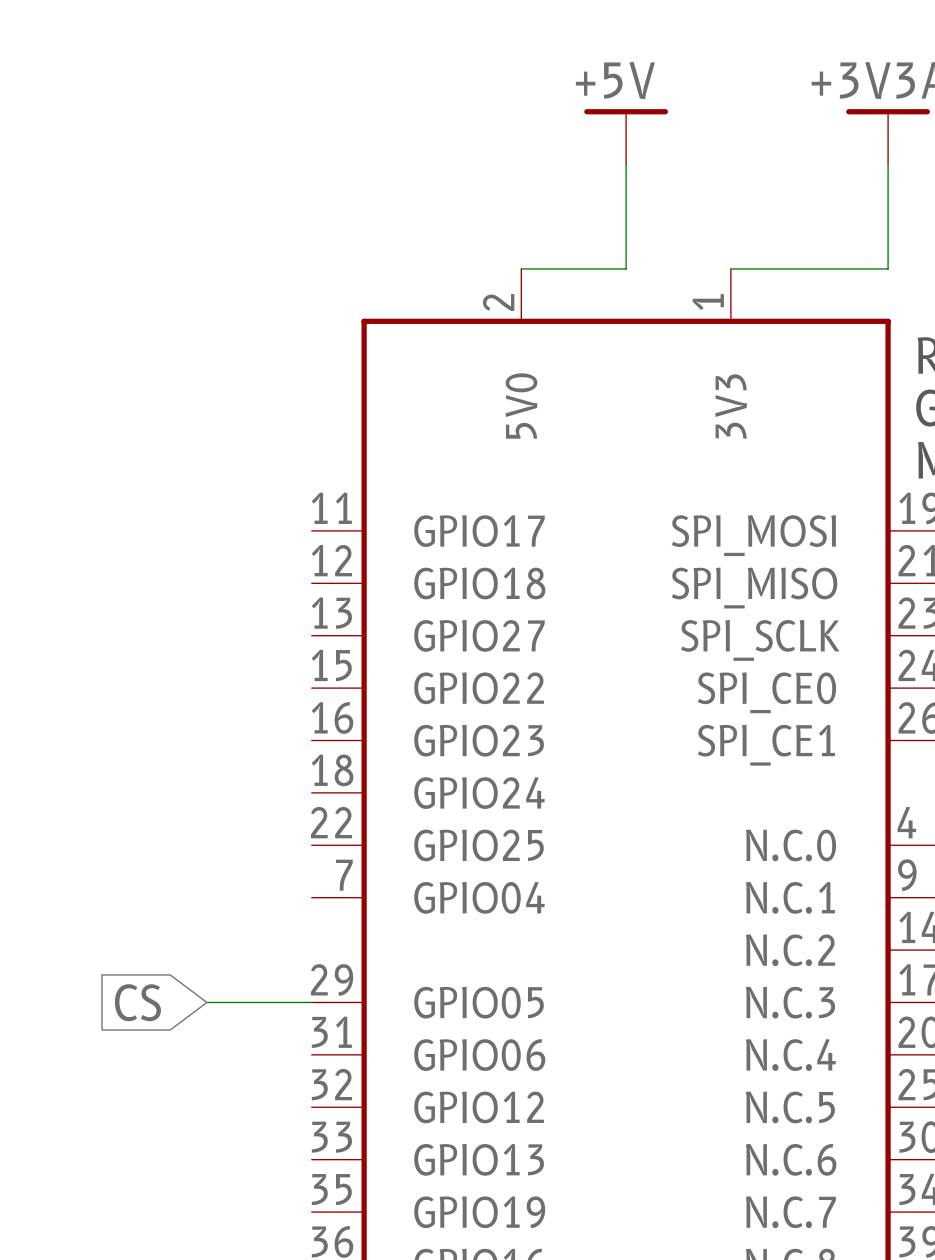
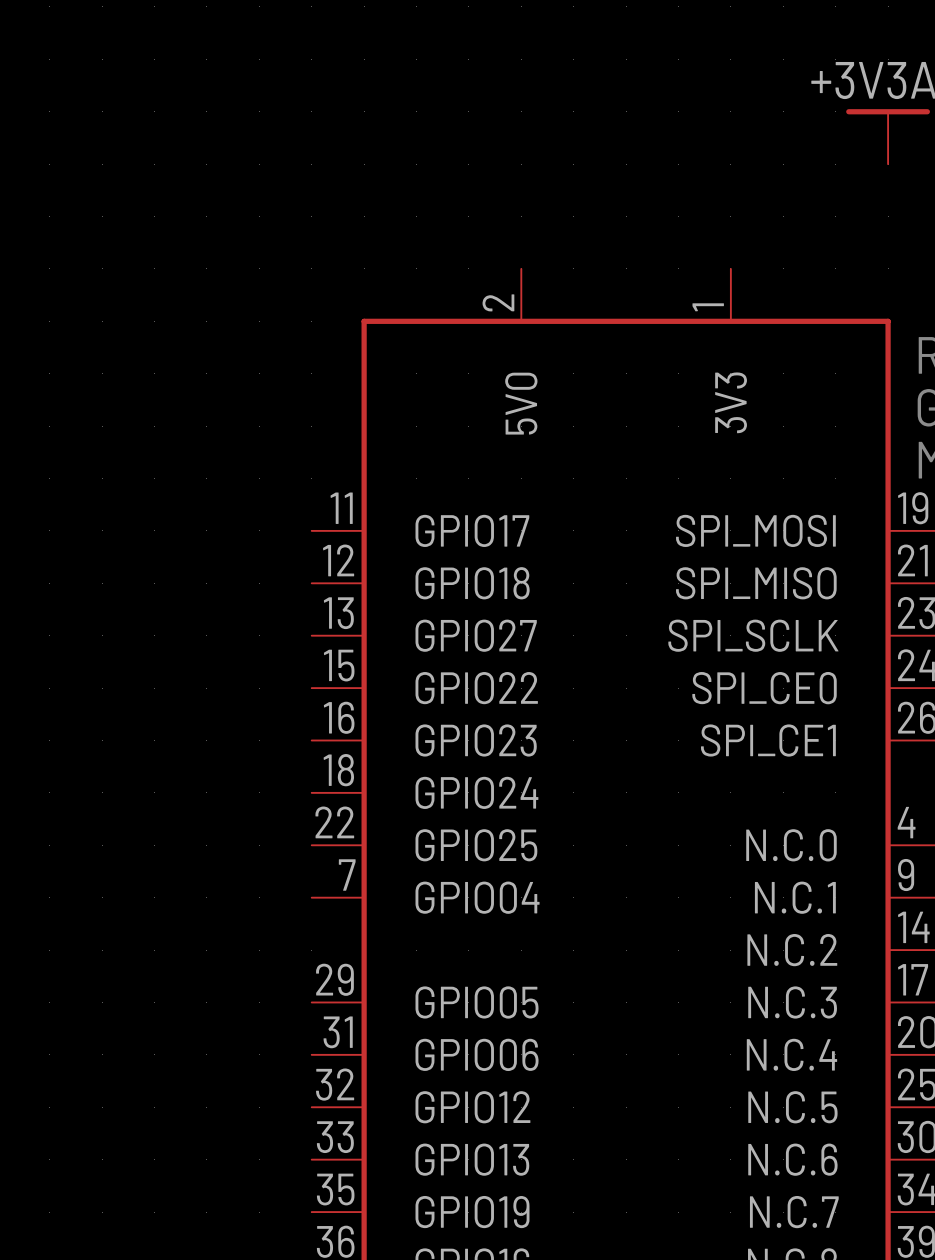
power symbol: +5V (626, 136) -> none
wire: (626, 164) (626, 268) (521, 268) -> none
wire: (888, 164) (888, 268) (730, 268) -> none
global label: CS (137, 1002) -> none
wire: (206, 1002) (311, 1002) -> none

